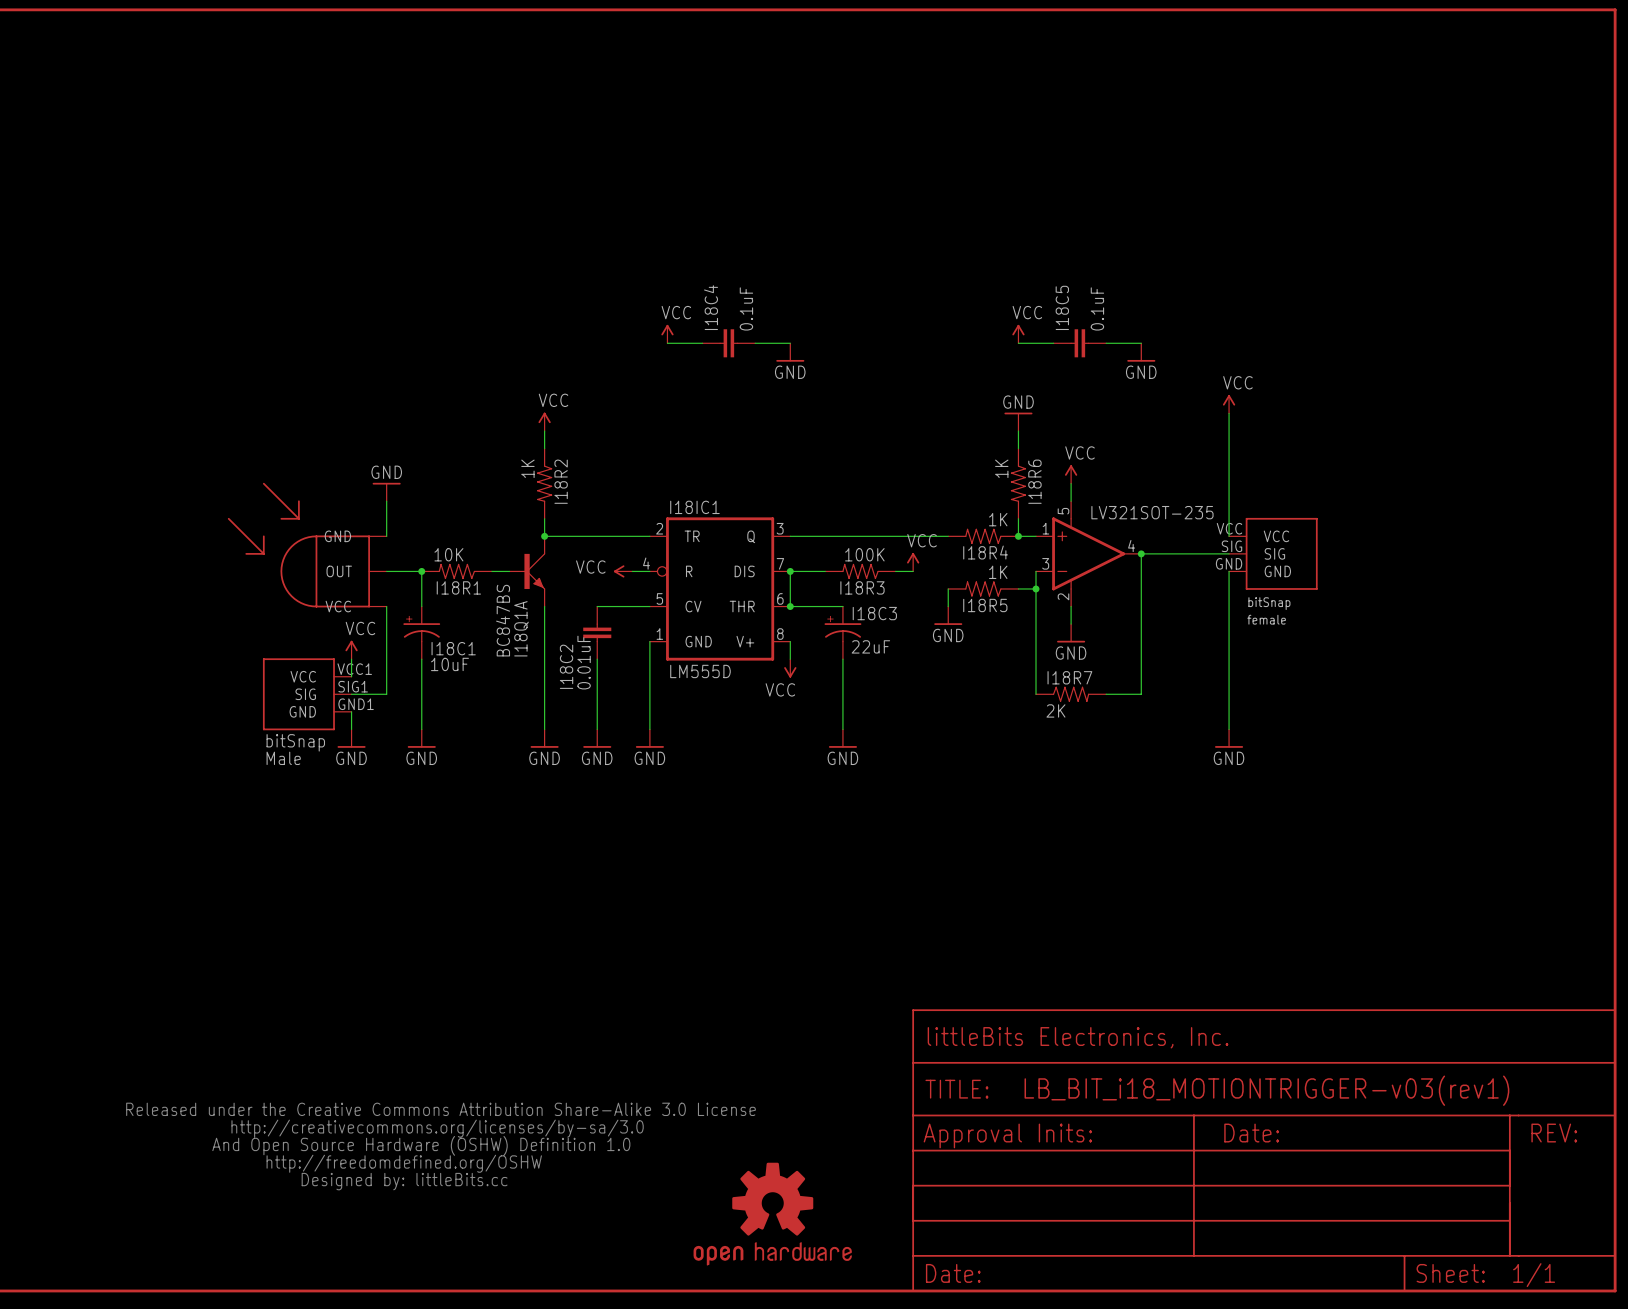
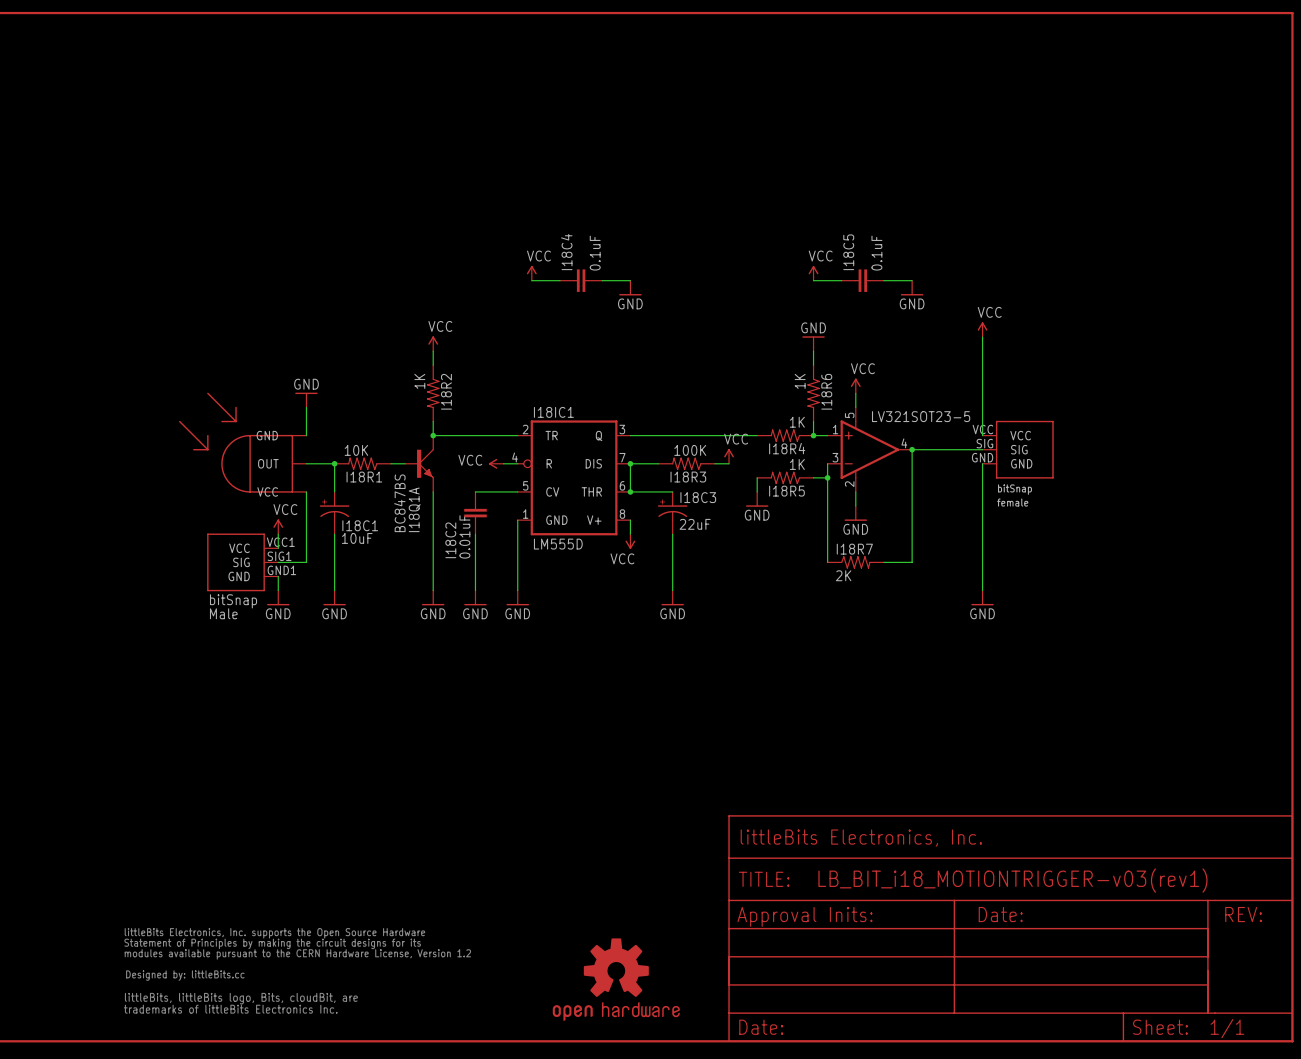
part value: LV321SOT-235 (1152, 512) -> LV321SOT23-5 (921, 416)
part: (441, 1146) -> none
part: none -> (297, 970)

